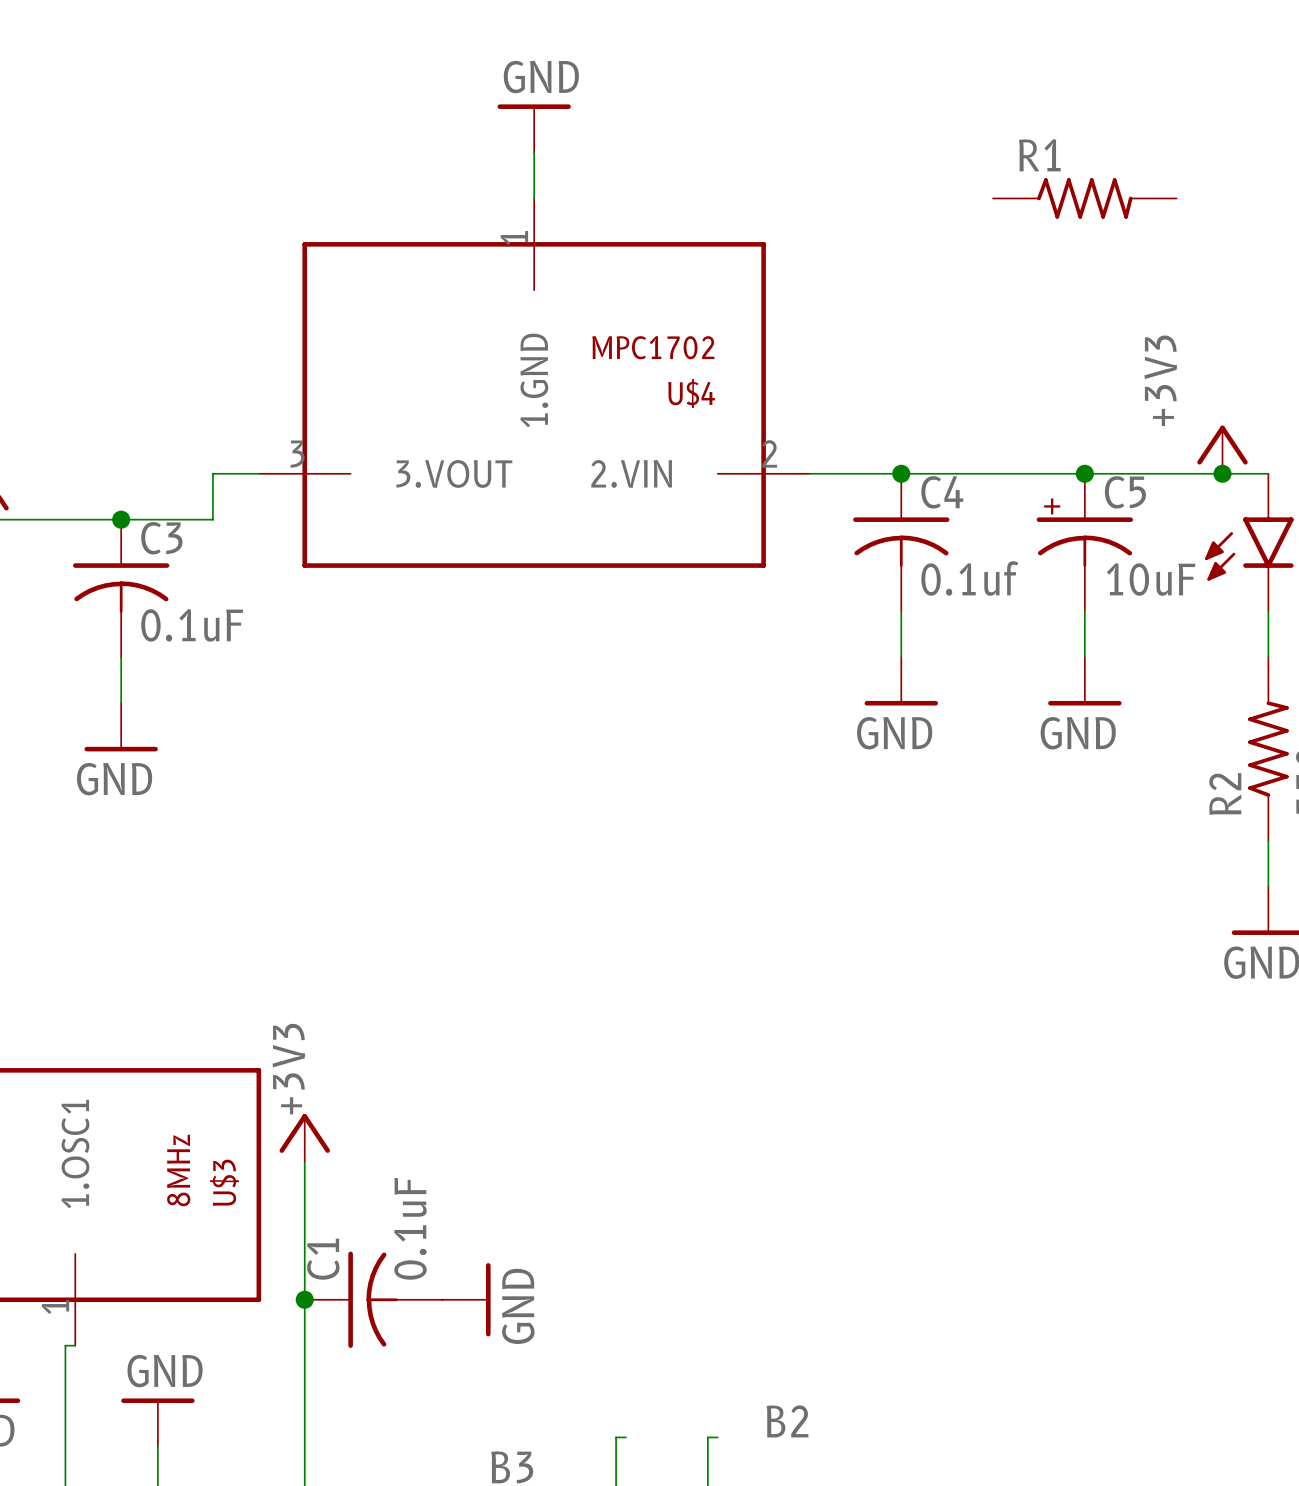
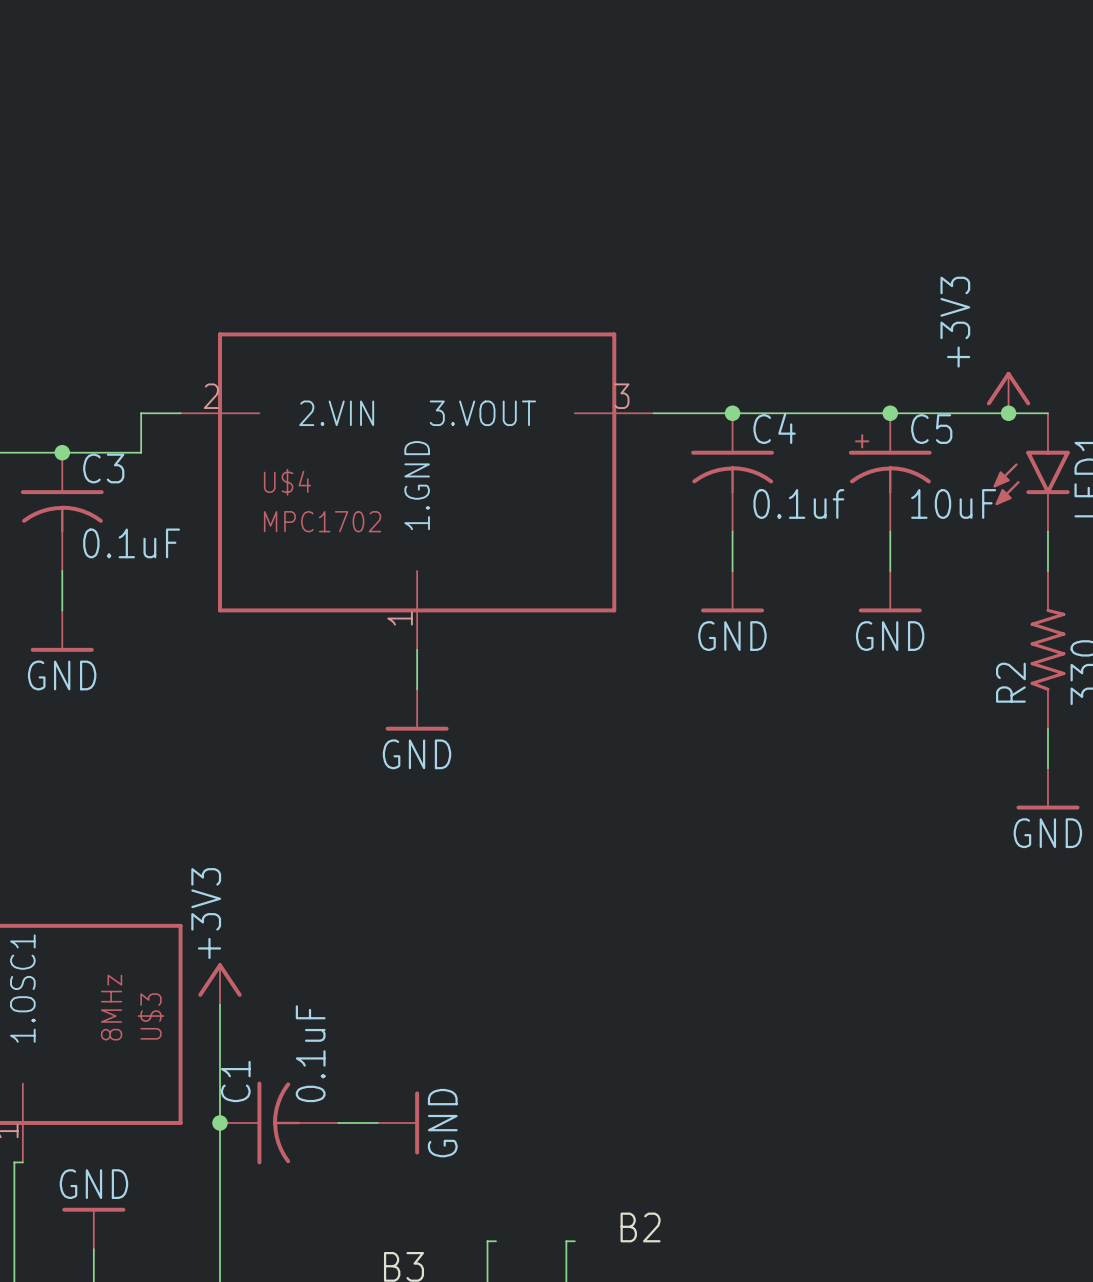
power symbol: GND (534, 128) -> none
wire: (534, 152) (534, 198) -> none
R1: (1084, 198) -> none
U$4 rotation: 0° (534, 404) -> 180° (417, 472)
wire: none -> (417, 649) (417, 689)
power symbol: none -> GND (417, 709)
power symbol position: GND (466, 1299) -> GND (398, 1122)

